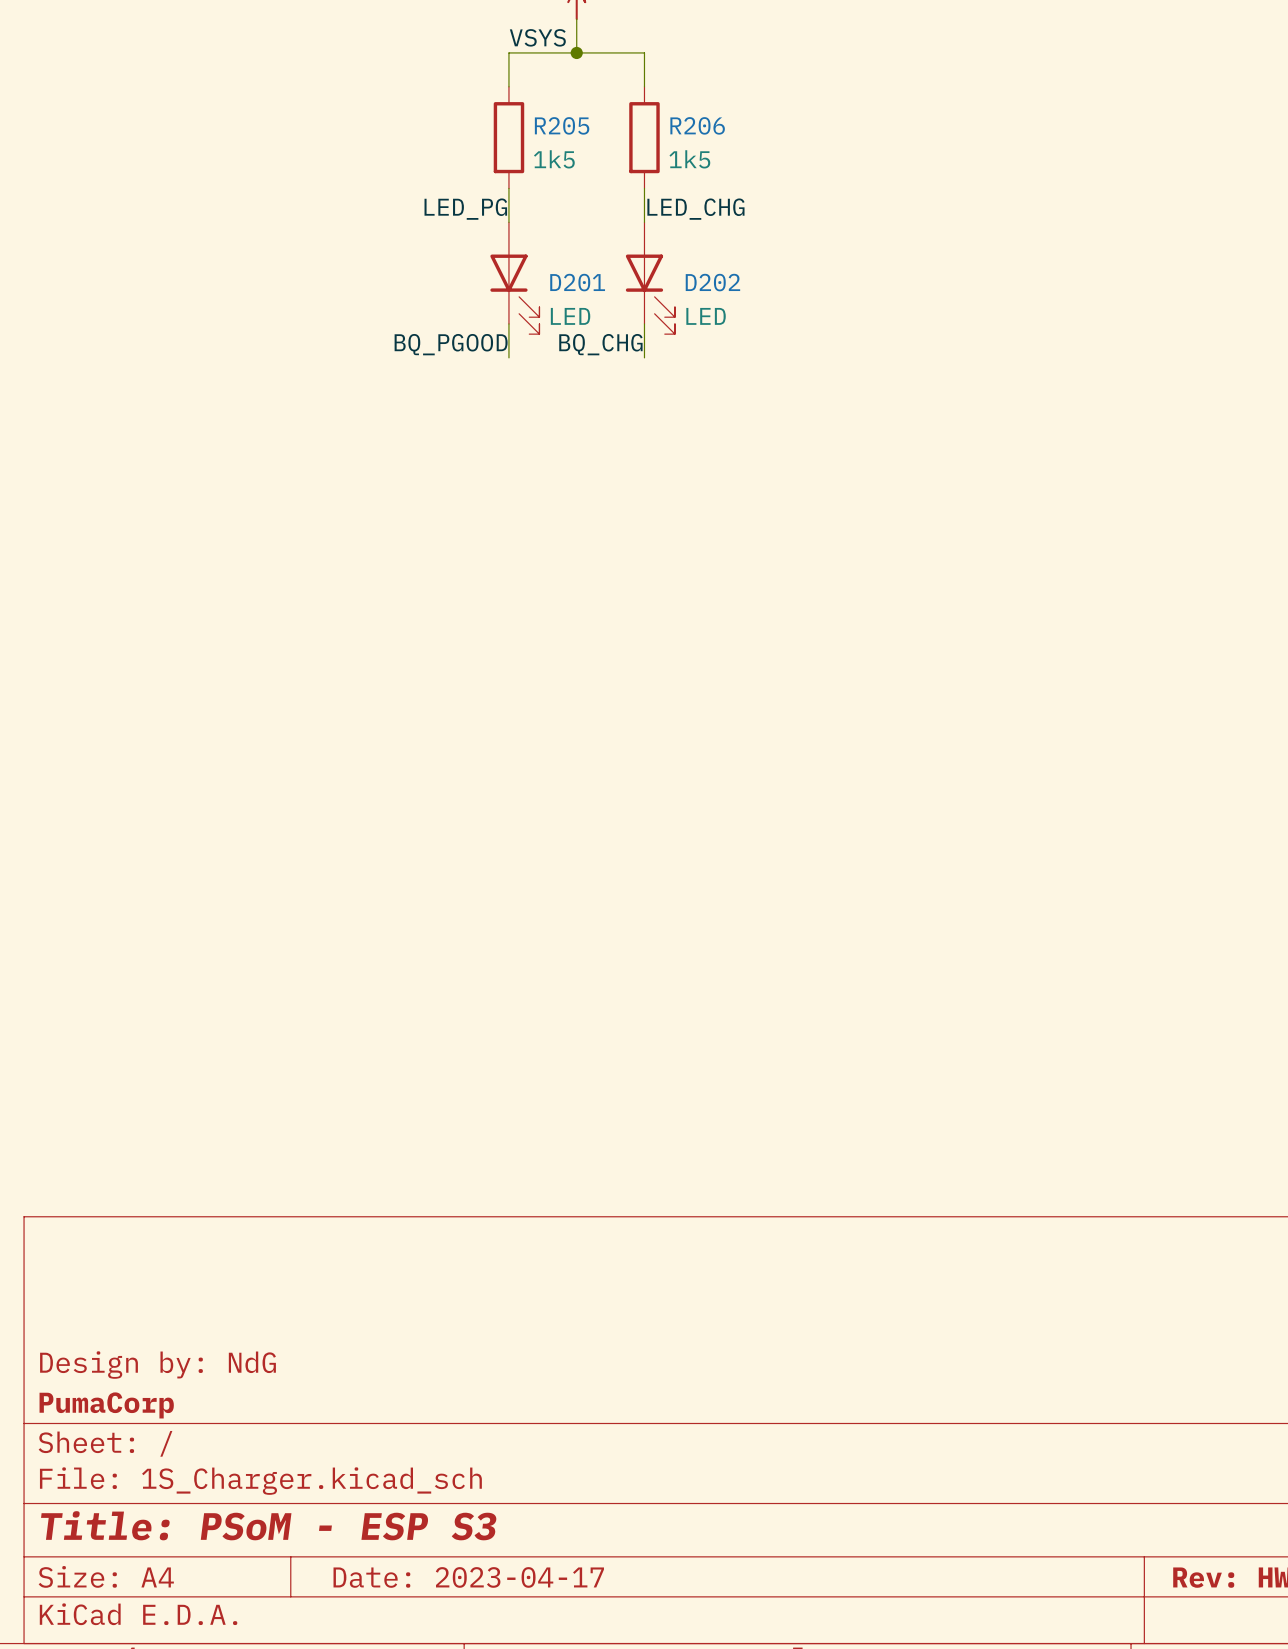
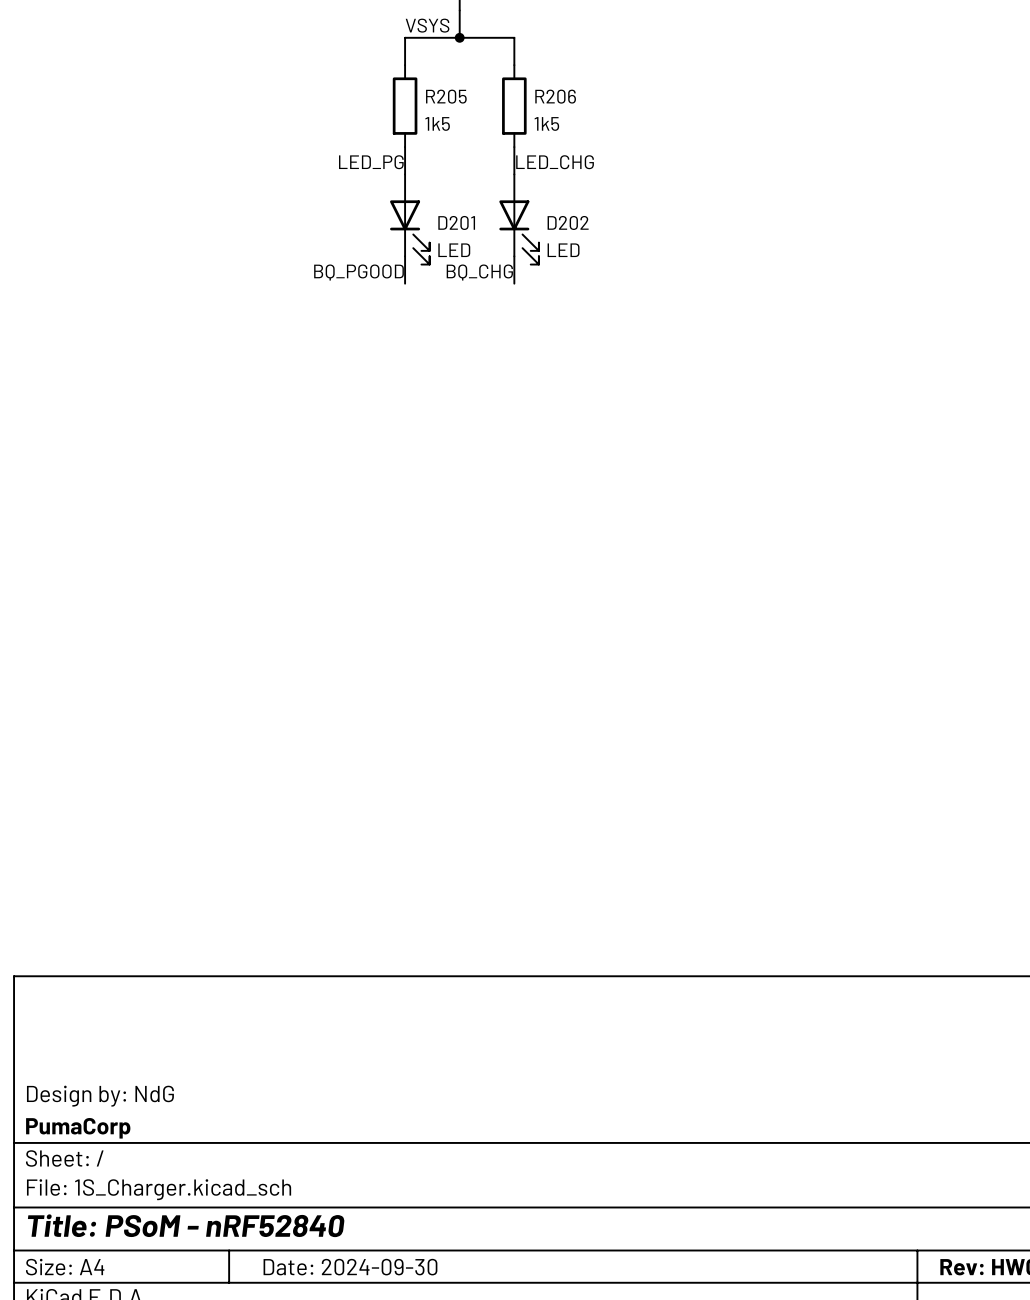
title block: Title: PSoM - ESP S3 (268, 1525) -> Title: PSoM - nRF52840 (186, 1225)
title block: Date: 2023-04-17 (468, 1577) -> Date: 2024-09-30 (350, 1267)

